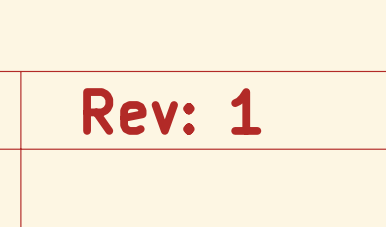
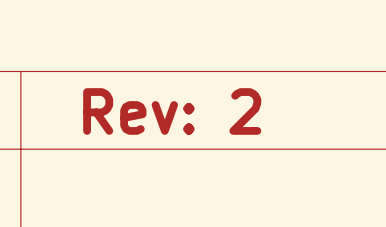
title block: Rev: 1 (172, 111) -> Rev: 2 (172, 111)

